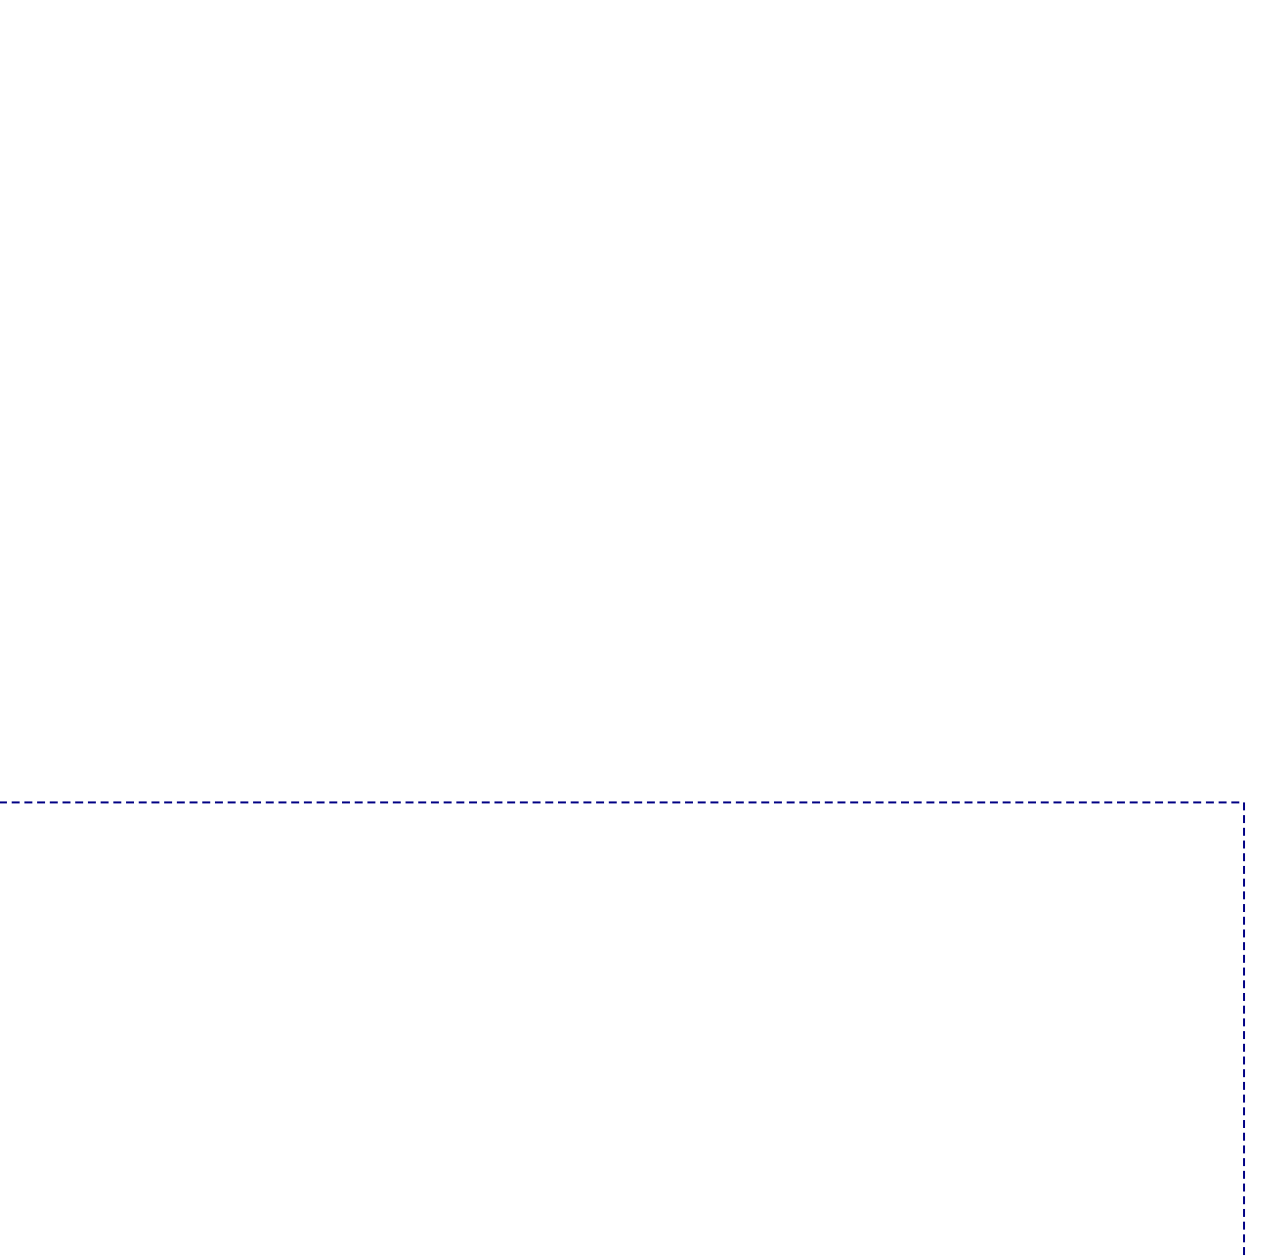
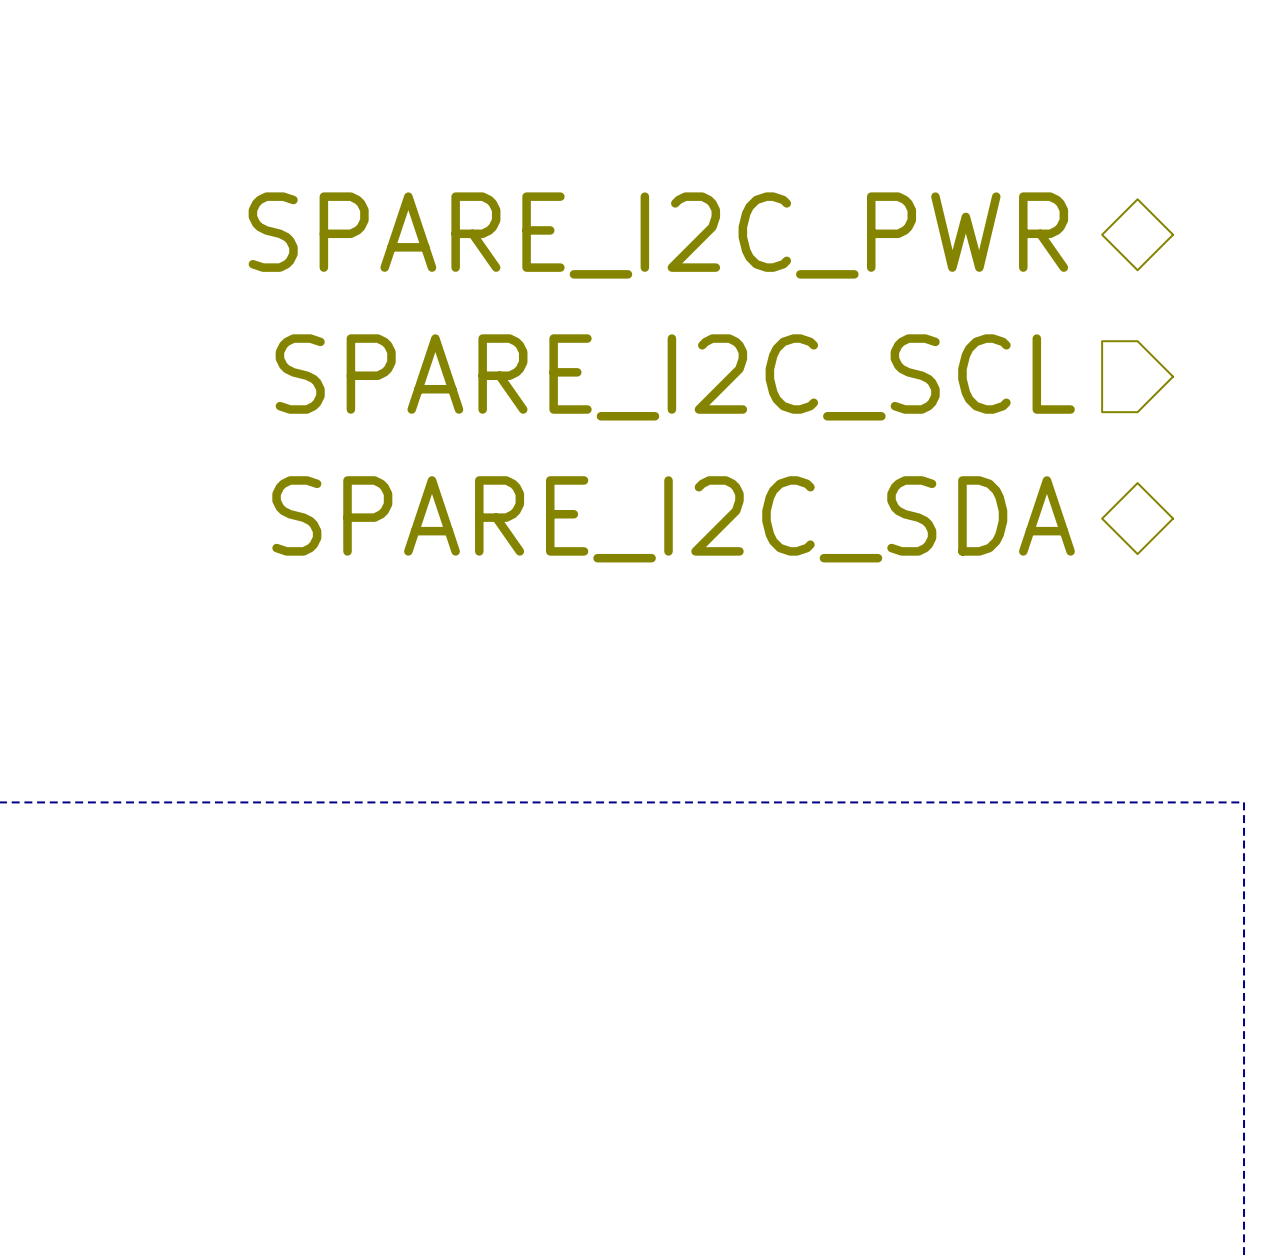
hierarchical label: none -> SPARE_I2C_PWR (658, 235)
hierarchical label: none -> SPARE_I2C_SCL (675, 377)
hierarchical label: none -> SPARE_I2C_SDA (673, 519)

